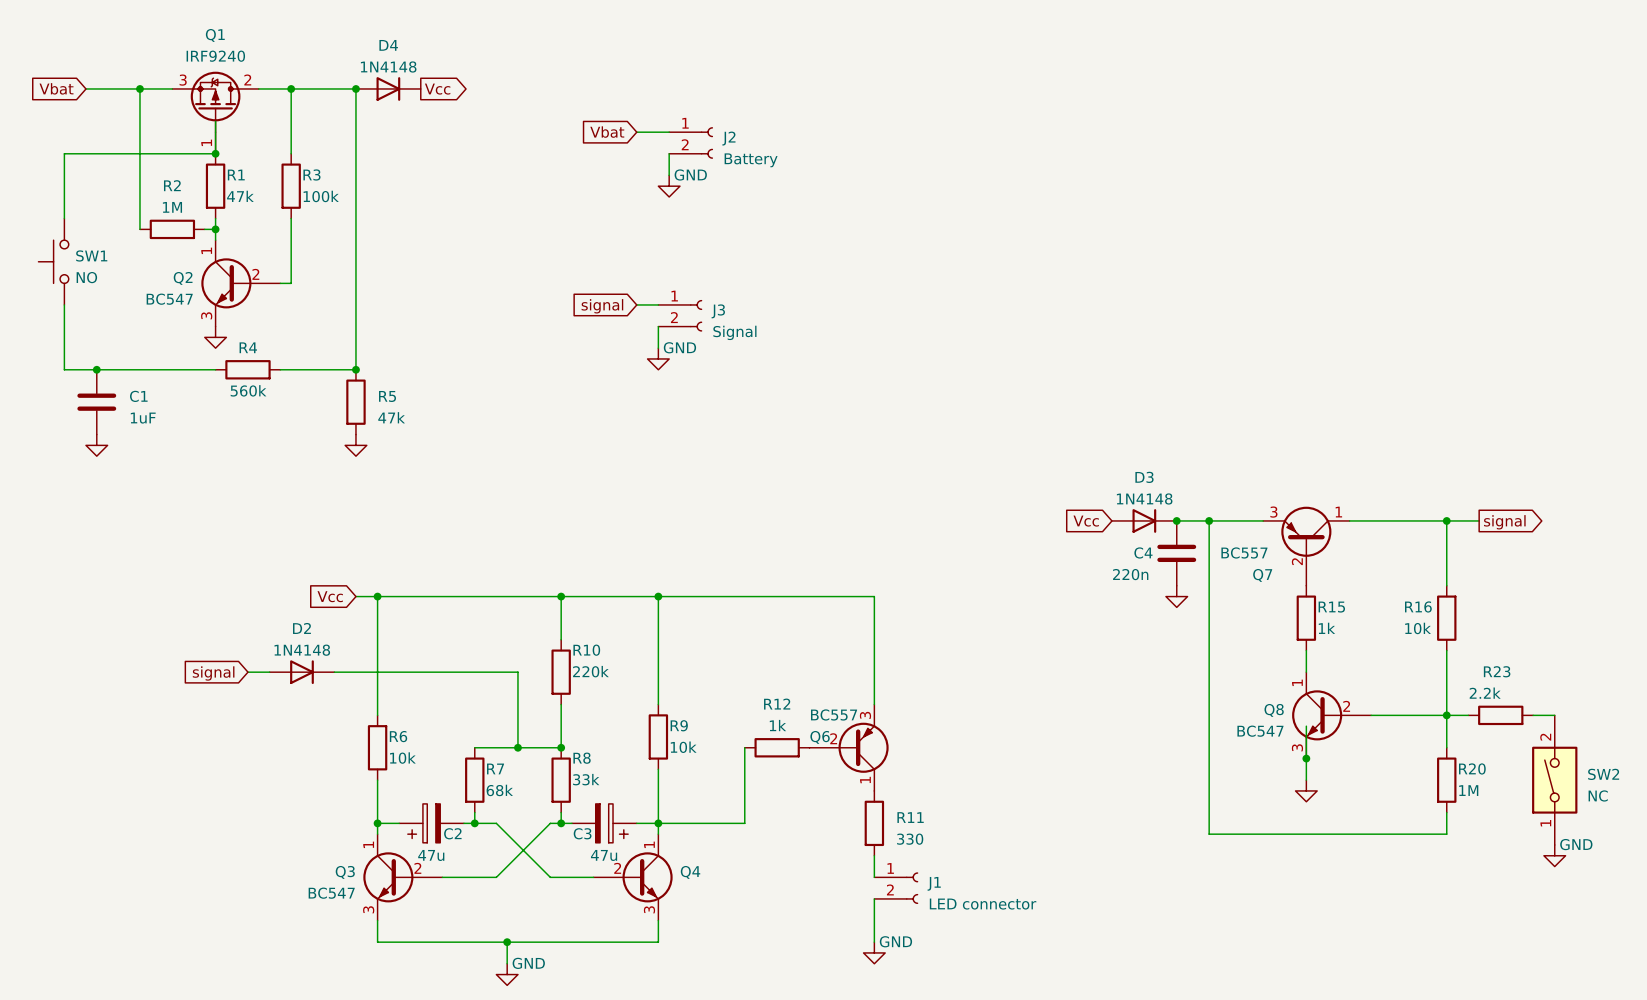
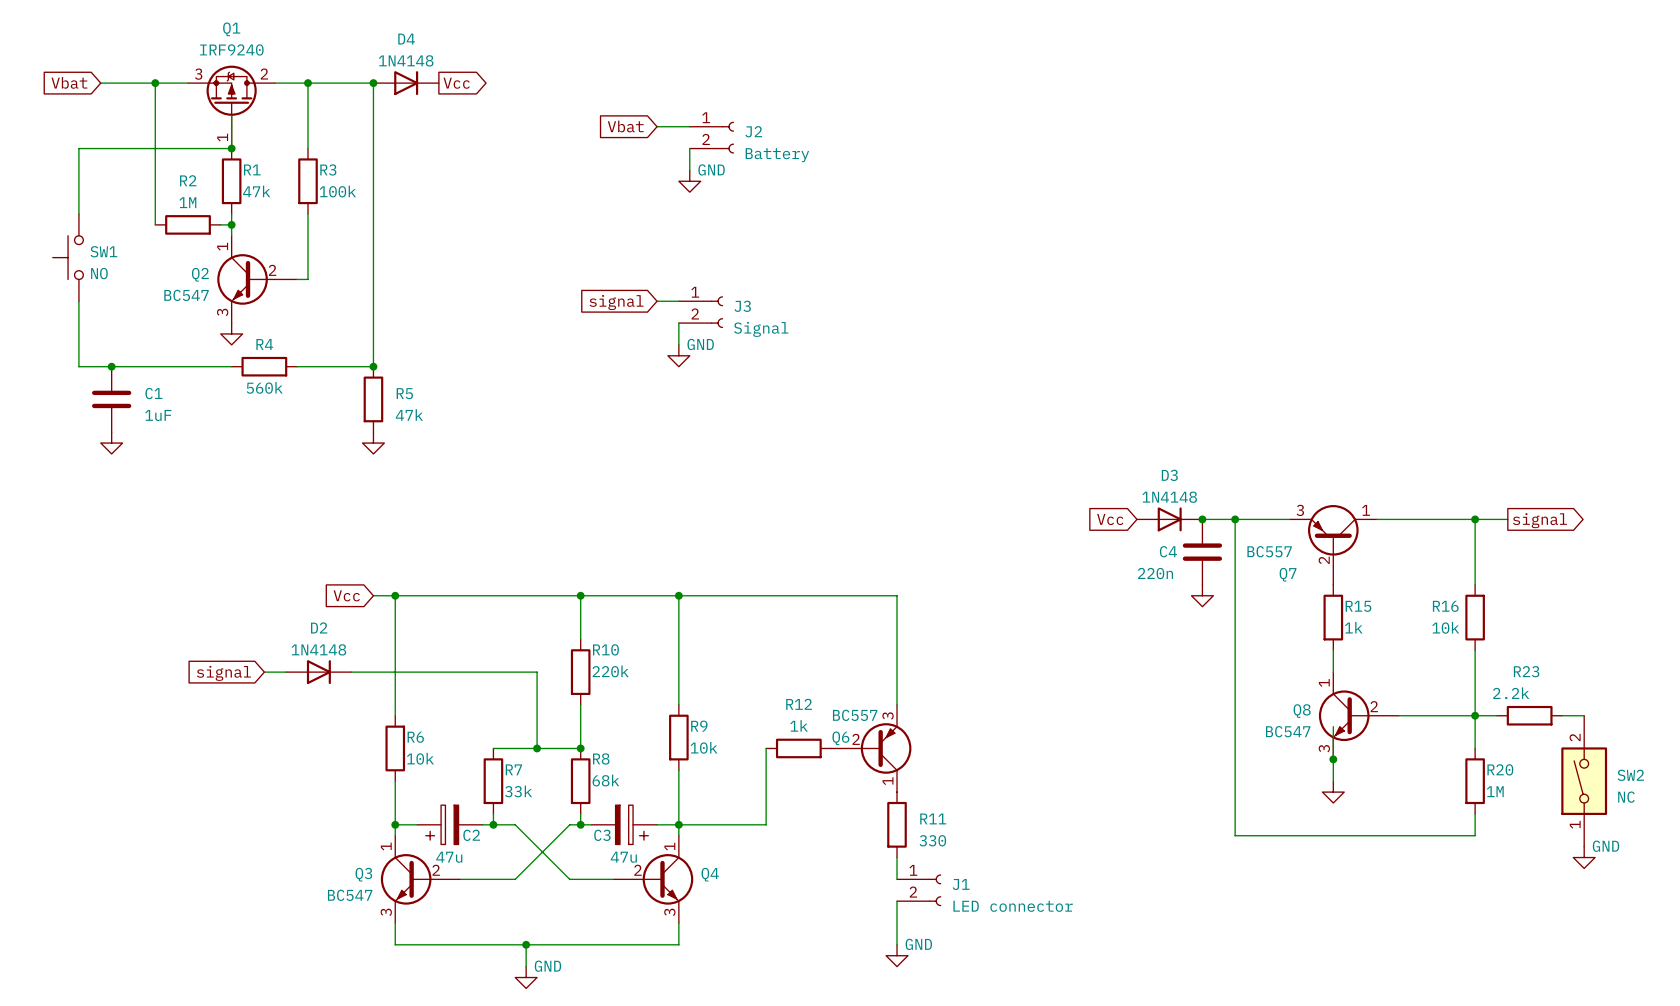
R8 value: 33k (586, 779) -> 68k (605, 780)
R7 value: 68k (499, 790) -> 33k (518, 791)

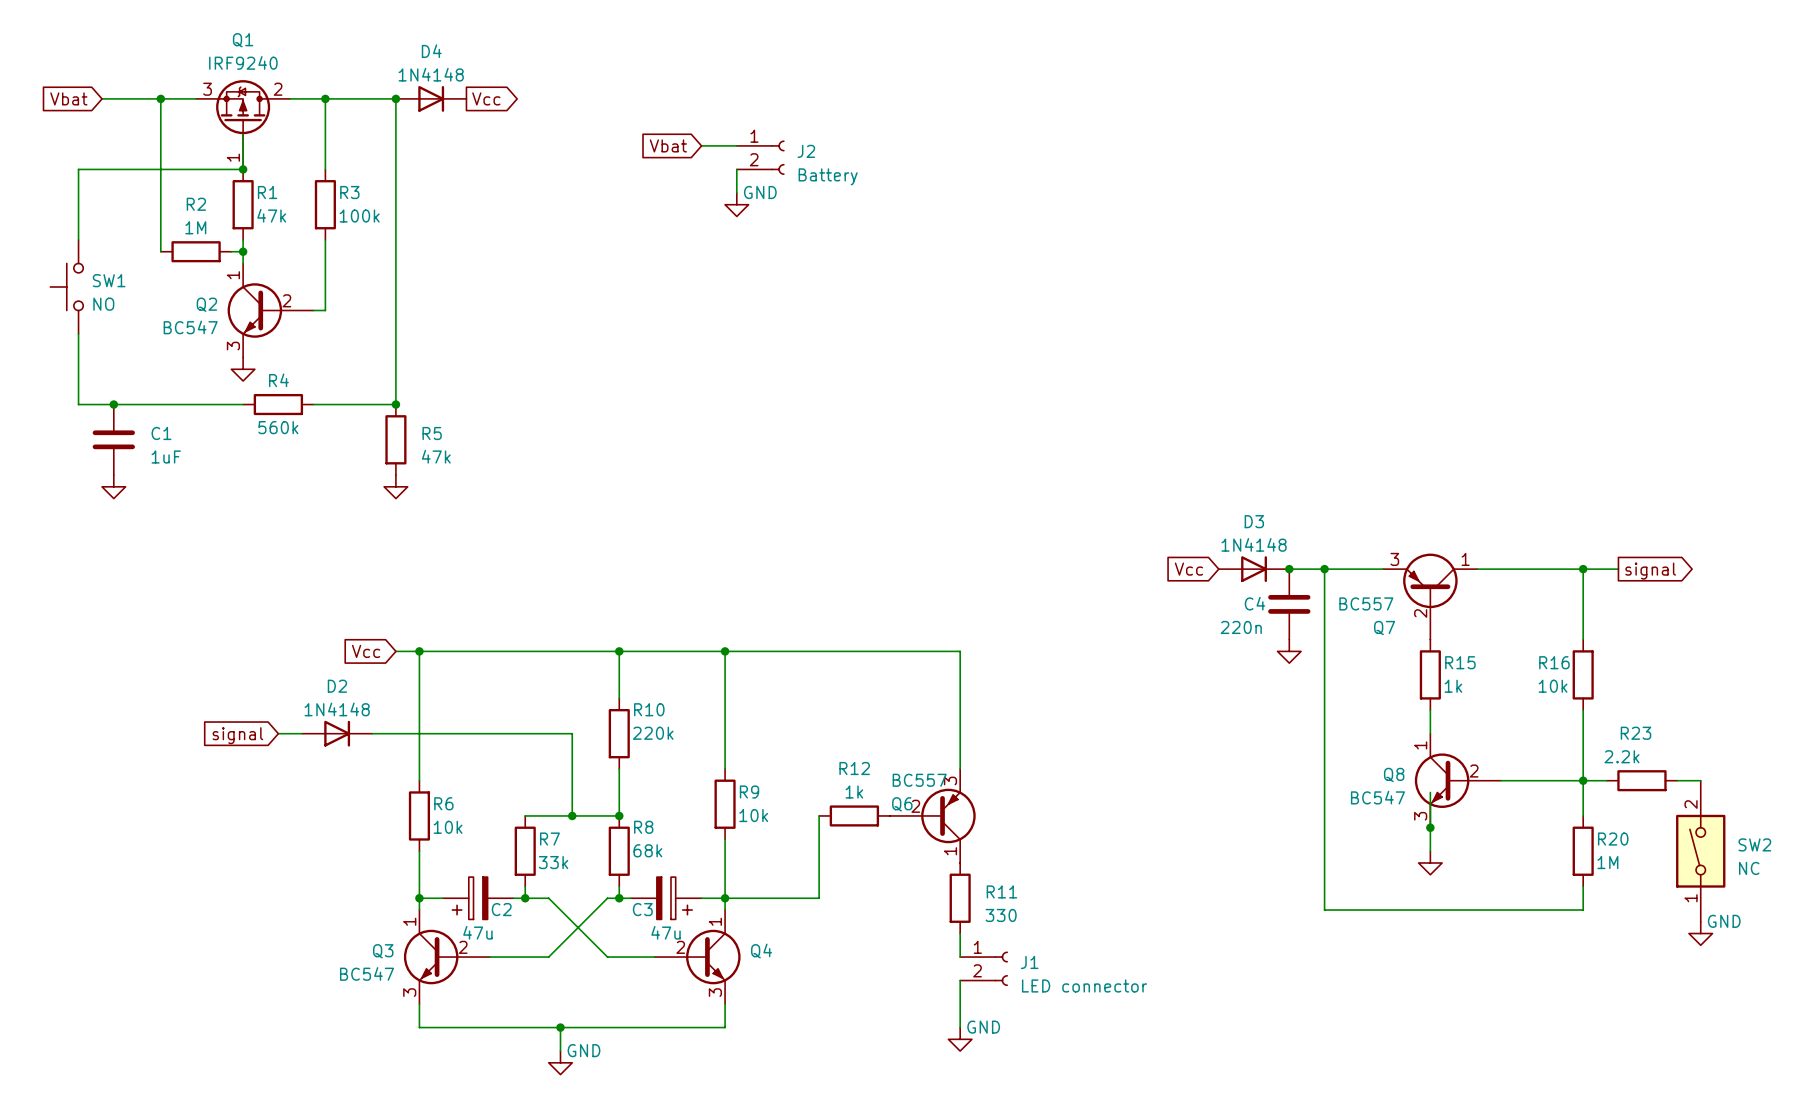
wire: (657, 301) (678, 301) -> none
global label: signal (616, 302) -> none
J3: Signal (701, 312) -> none
wire: (678, 323) (678, 344) -> none
power symbol: GND (678, 355) -> none

